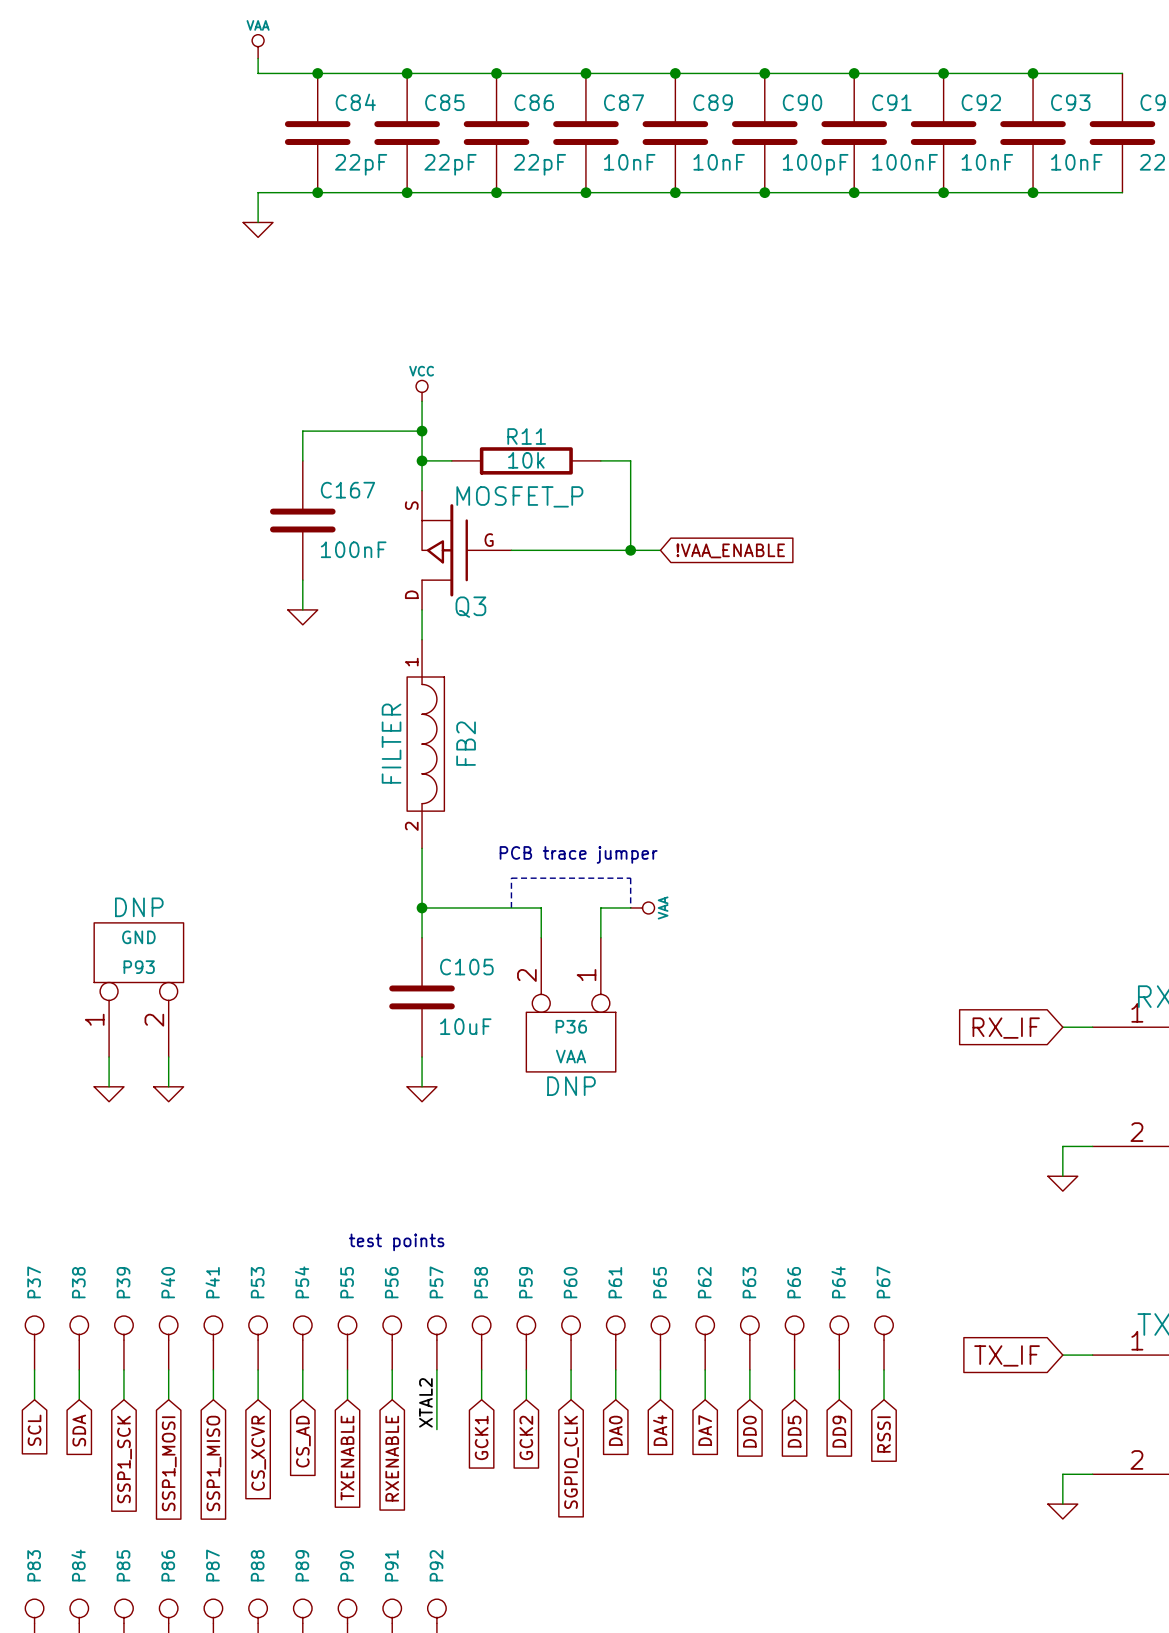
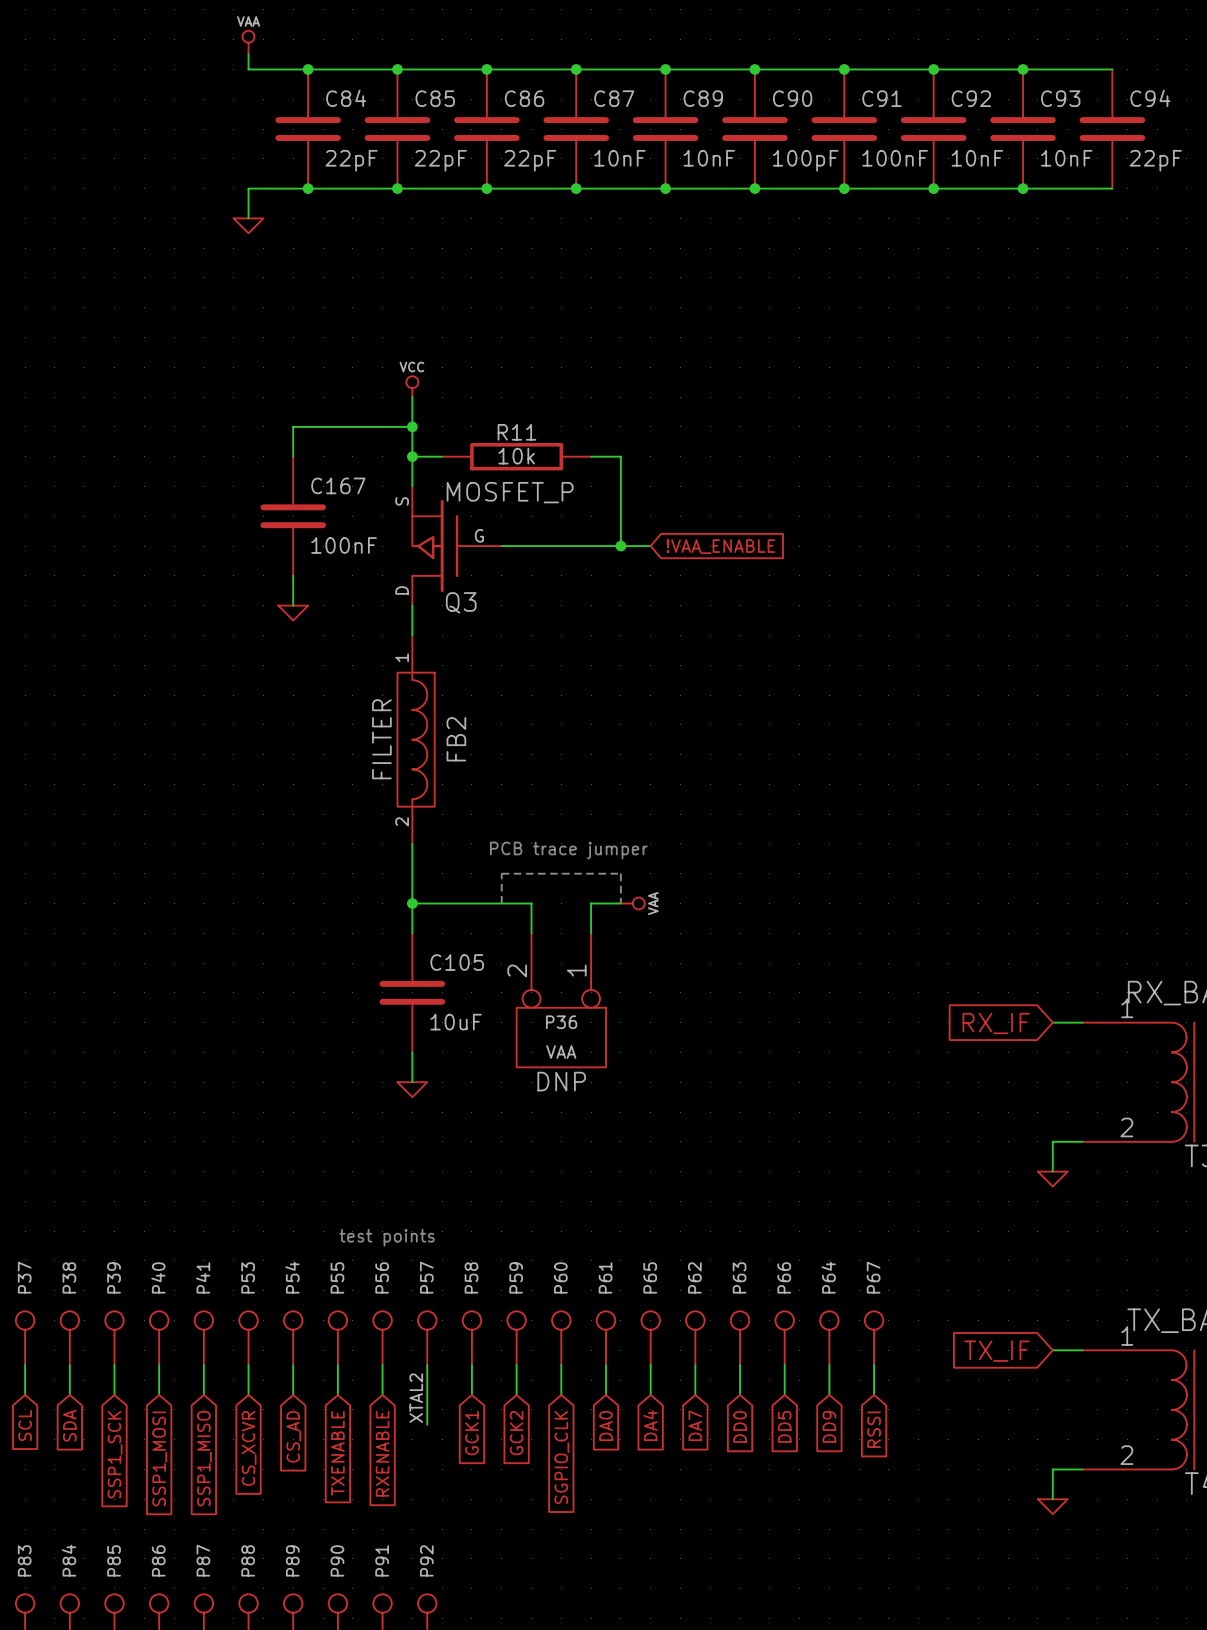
P93: GND (138, 989) -> none
wire: (109, 1057) (109, 1086) -> none
wire: (168, 1057) (168, 1086) -> none
power symbol: (109, 1094) -> none
power symbol: (168, 1094) -> none

